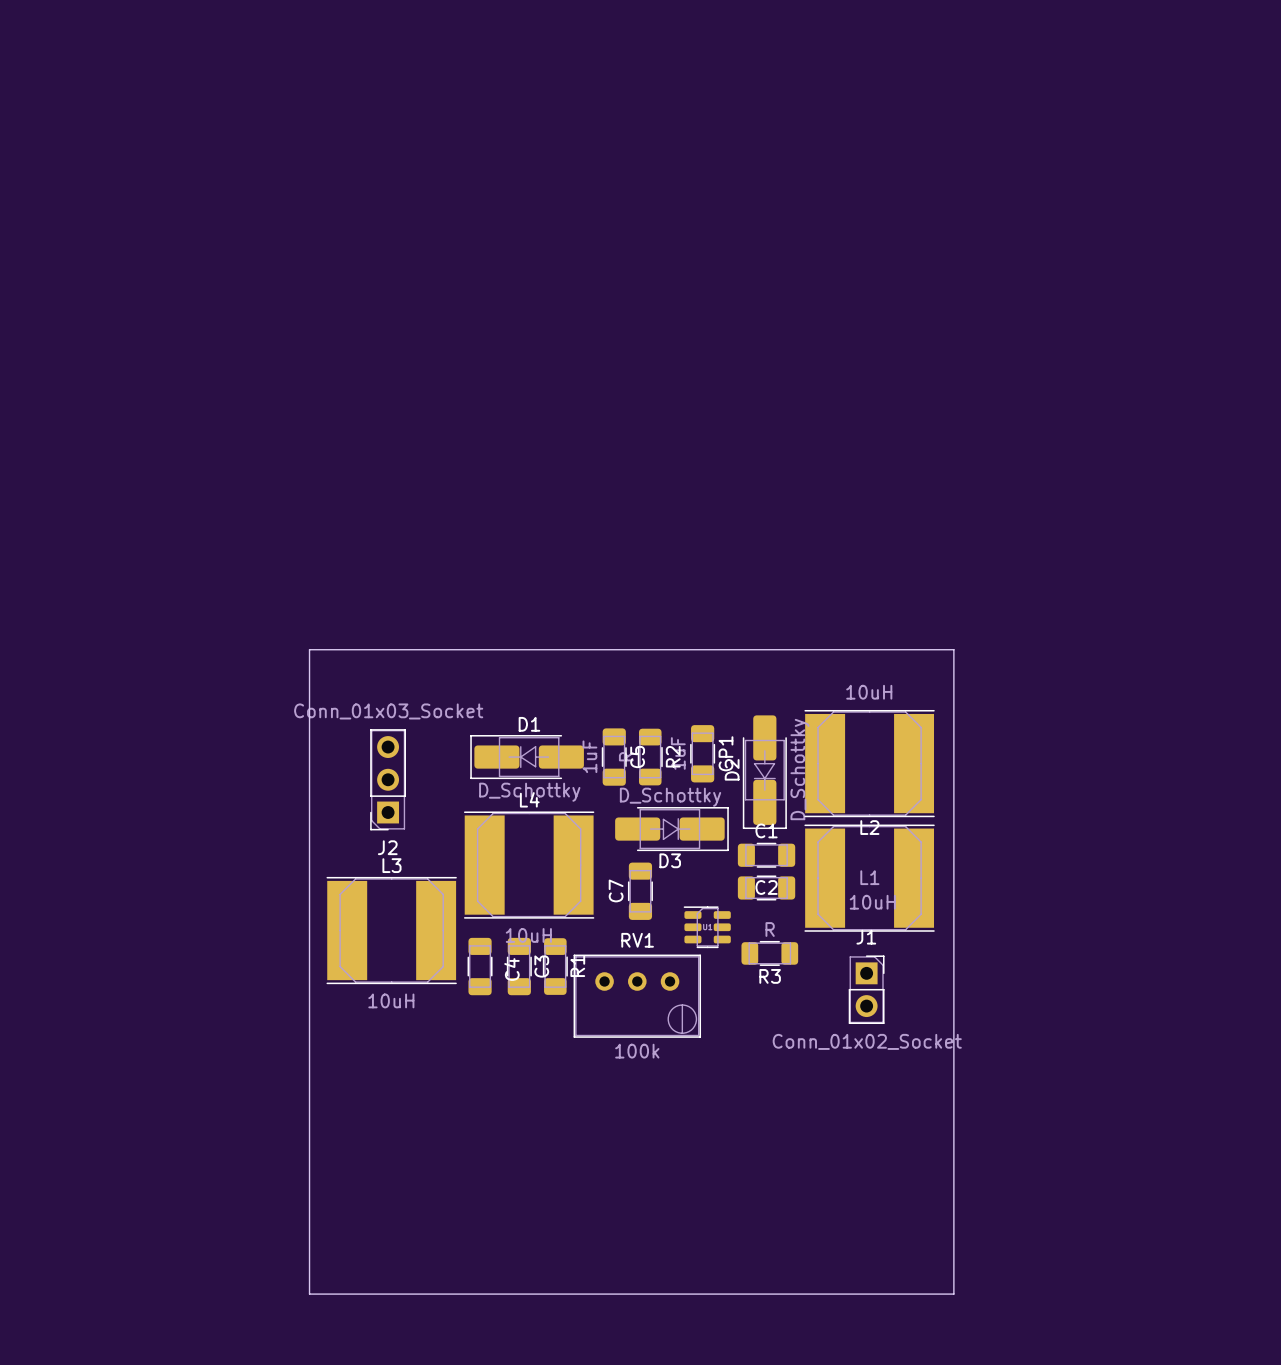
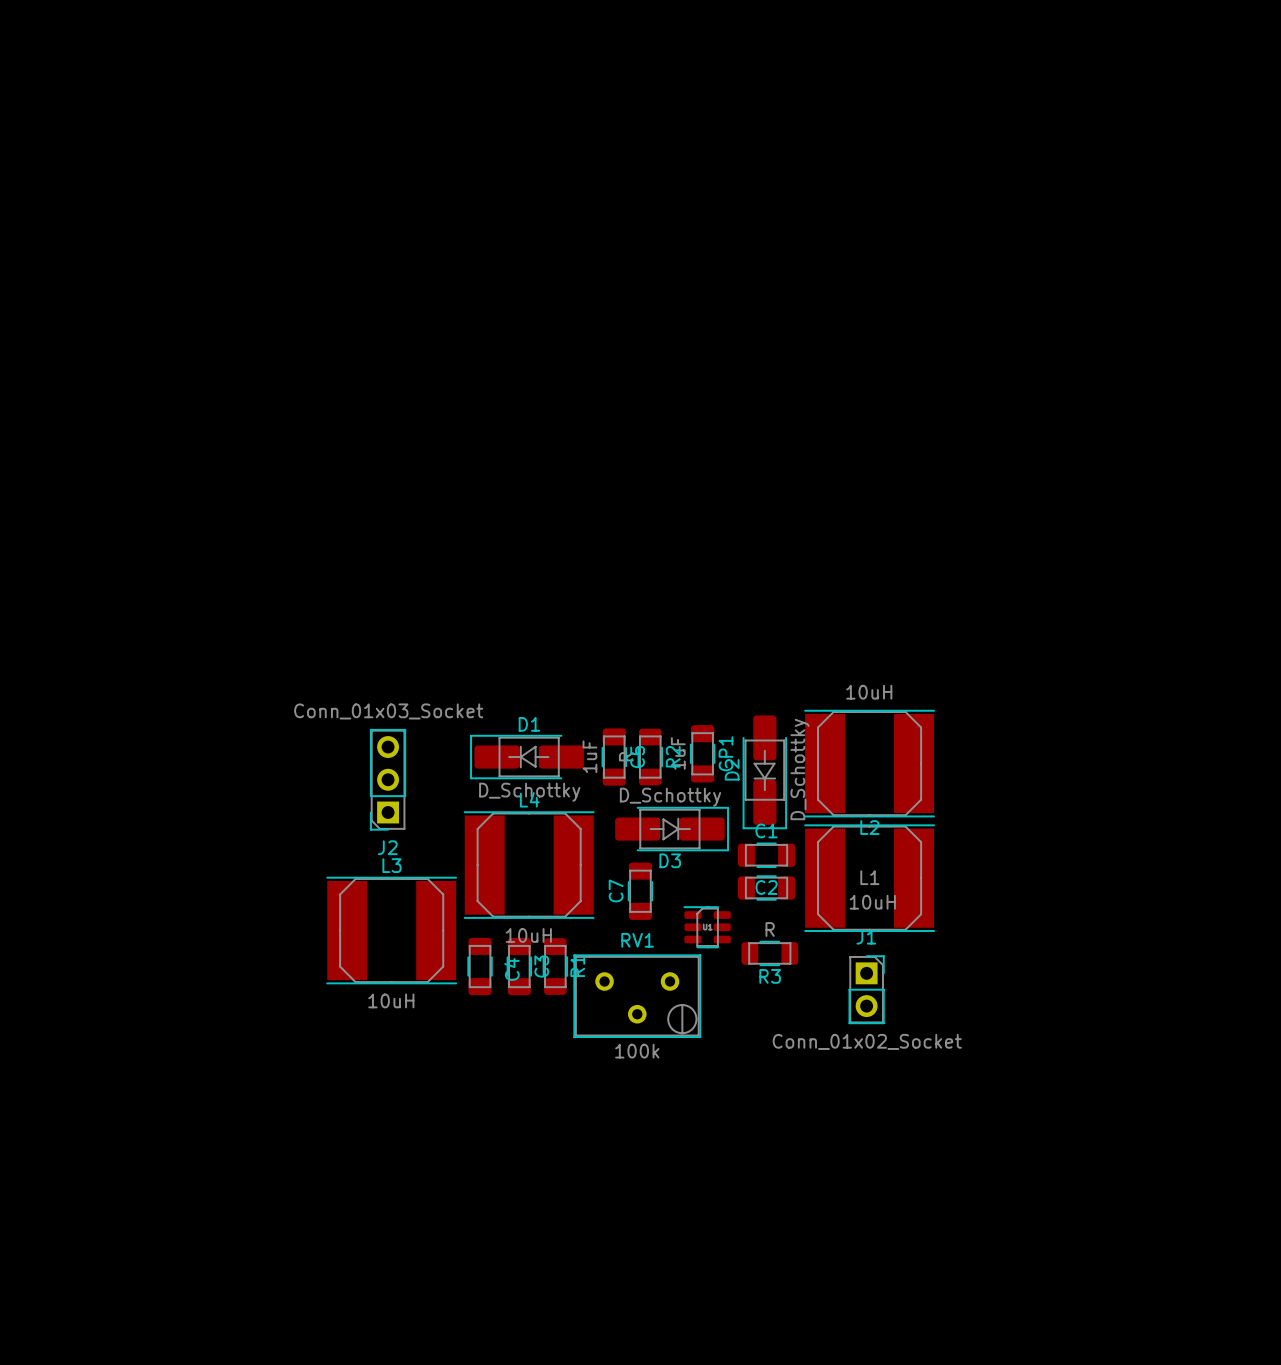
board edge: (309, 649) (953, 649) (953, 1294) (309, 1294) (309, 649) -> none
RV1 footprint: [573, 954, 702, 1038] -> [573, 954, 702, 1038]

